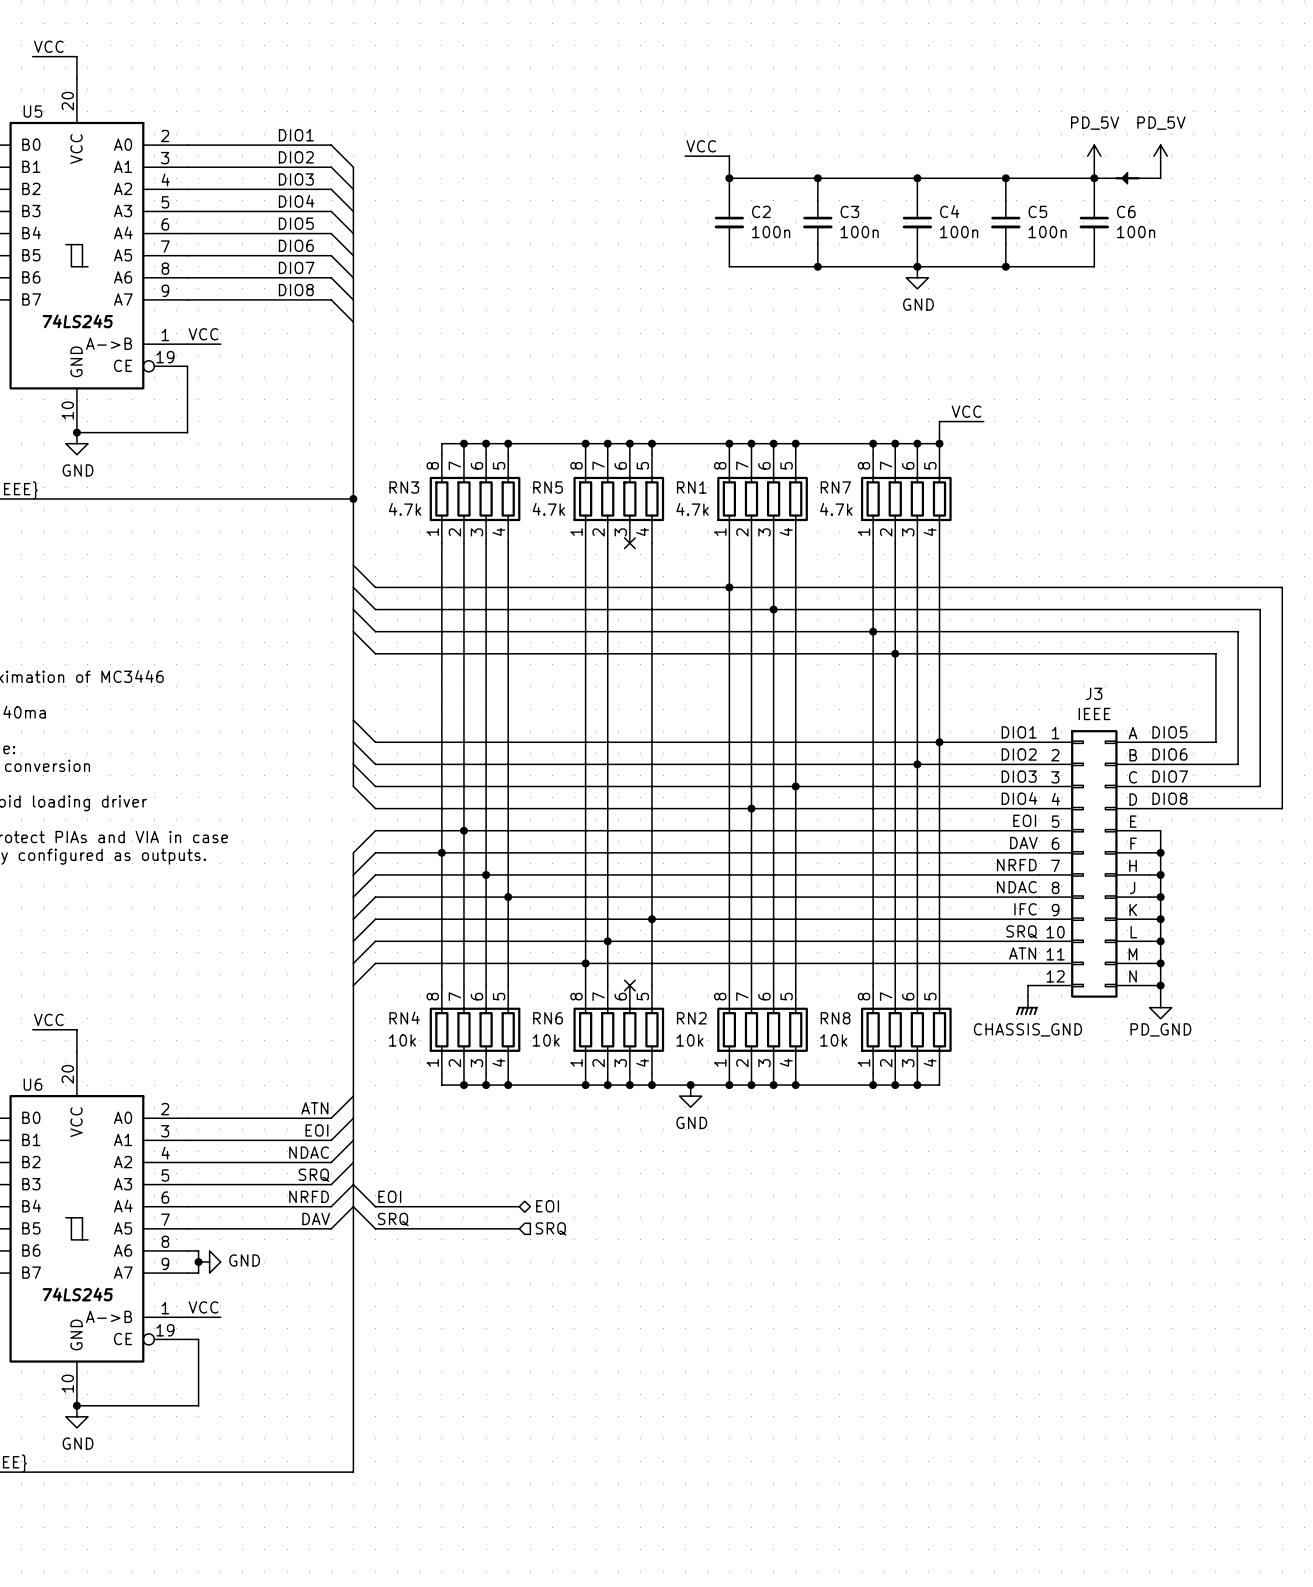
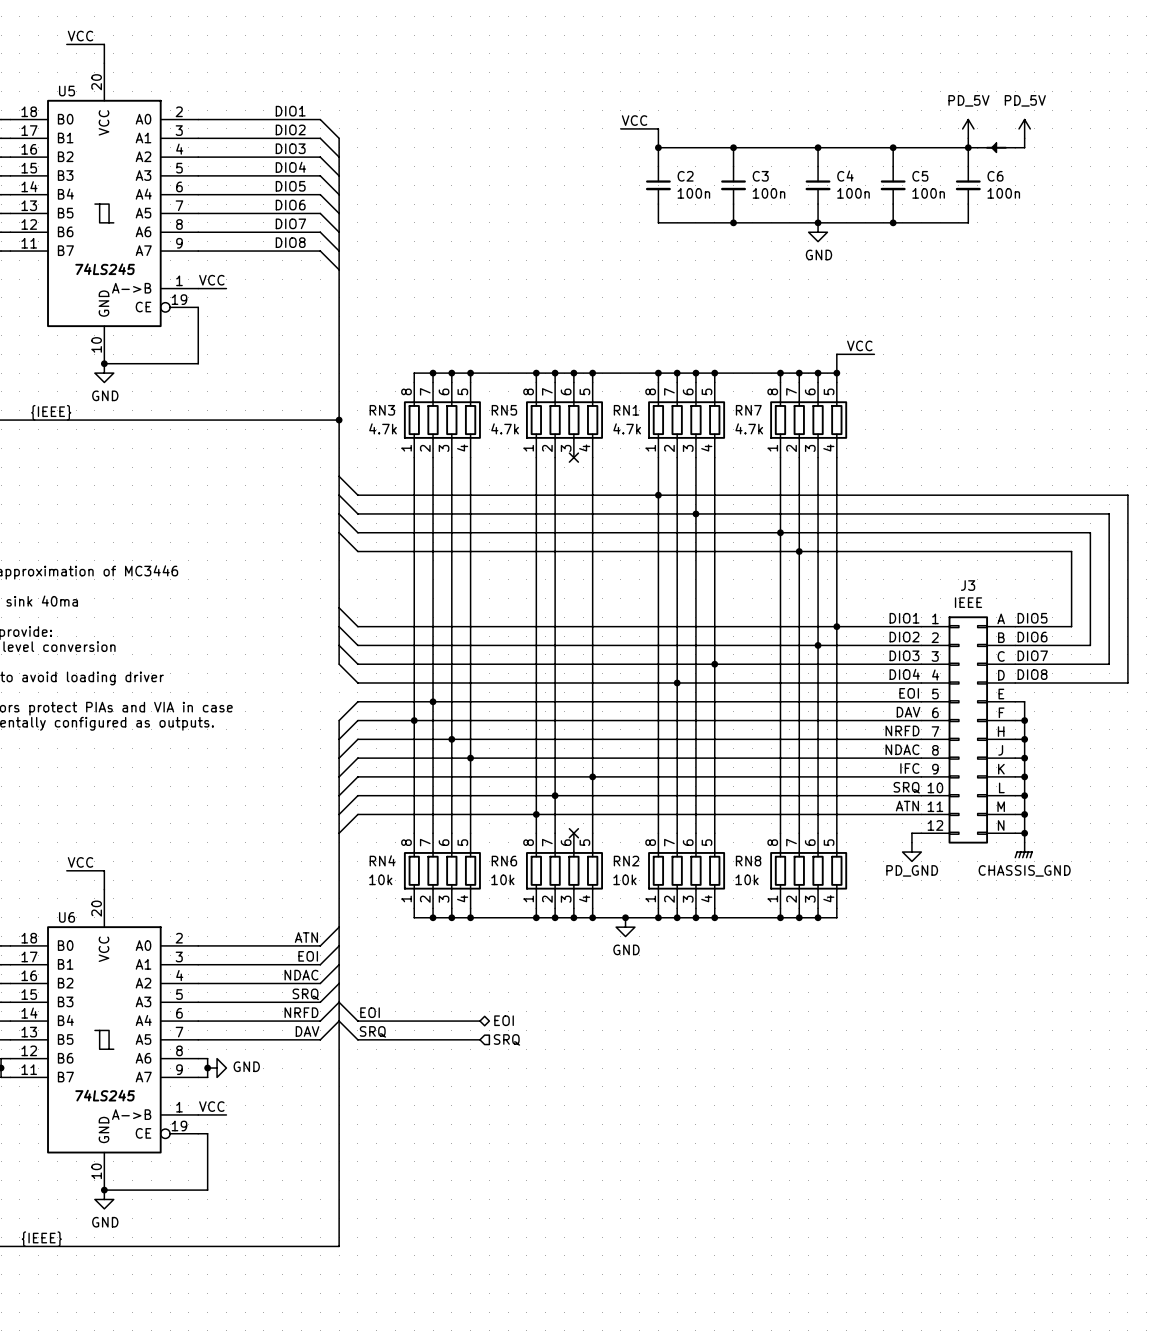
power symbol: CHASSIS_GND (1026, 1005) -> PD_GND (911, 852)
power symbol: PD_GND (1160, 1007) -> CHASSIS_GND (1023, 850)

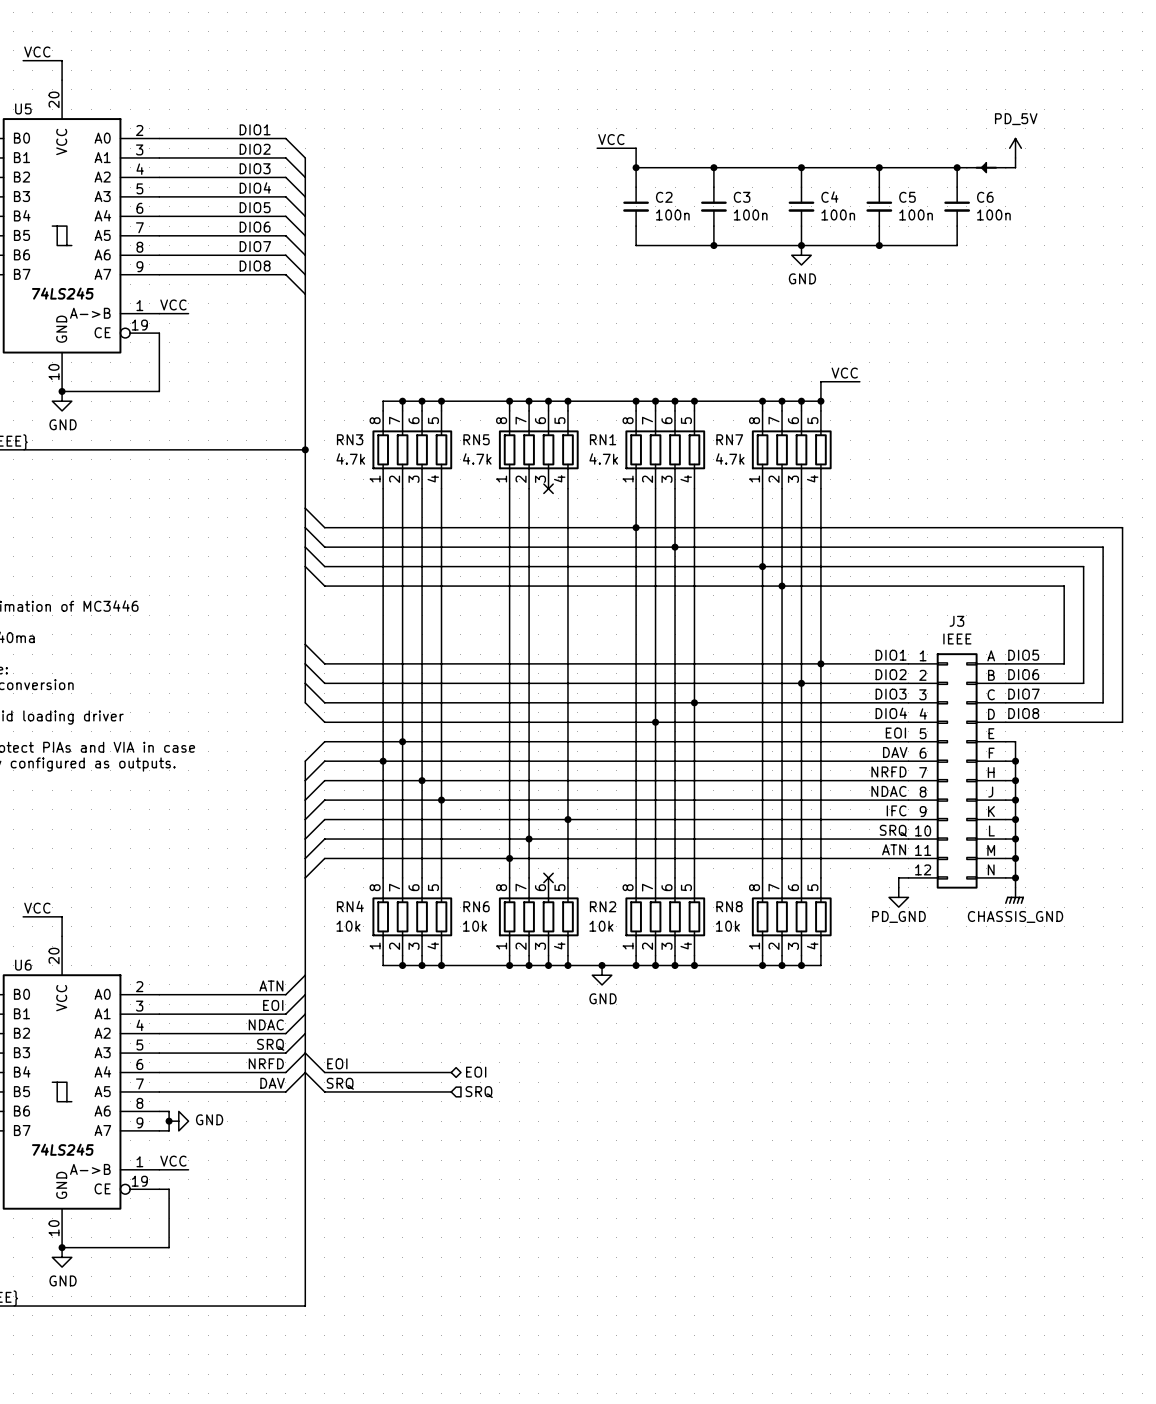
power symbol: PD_5V (968, 128) -> none
wire: (968, 138) (968, 147) -> none

